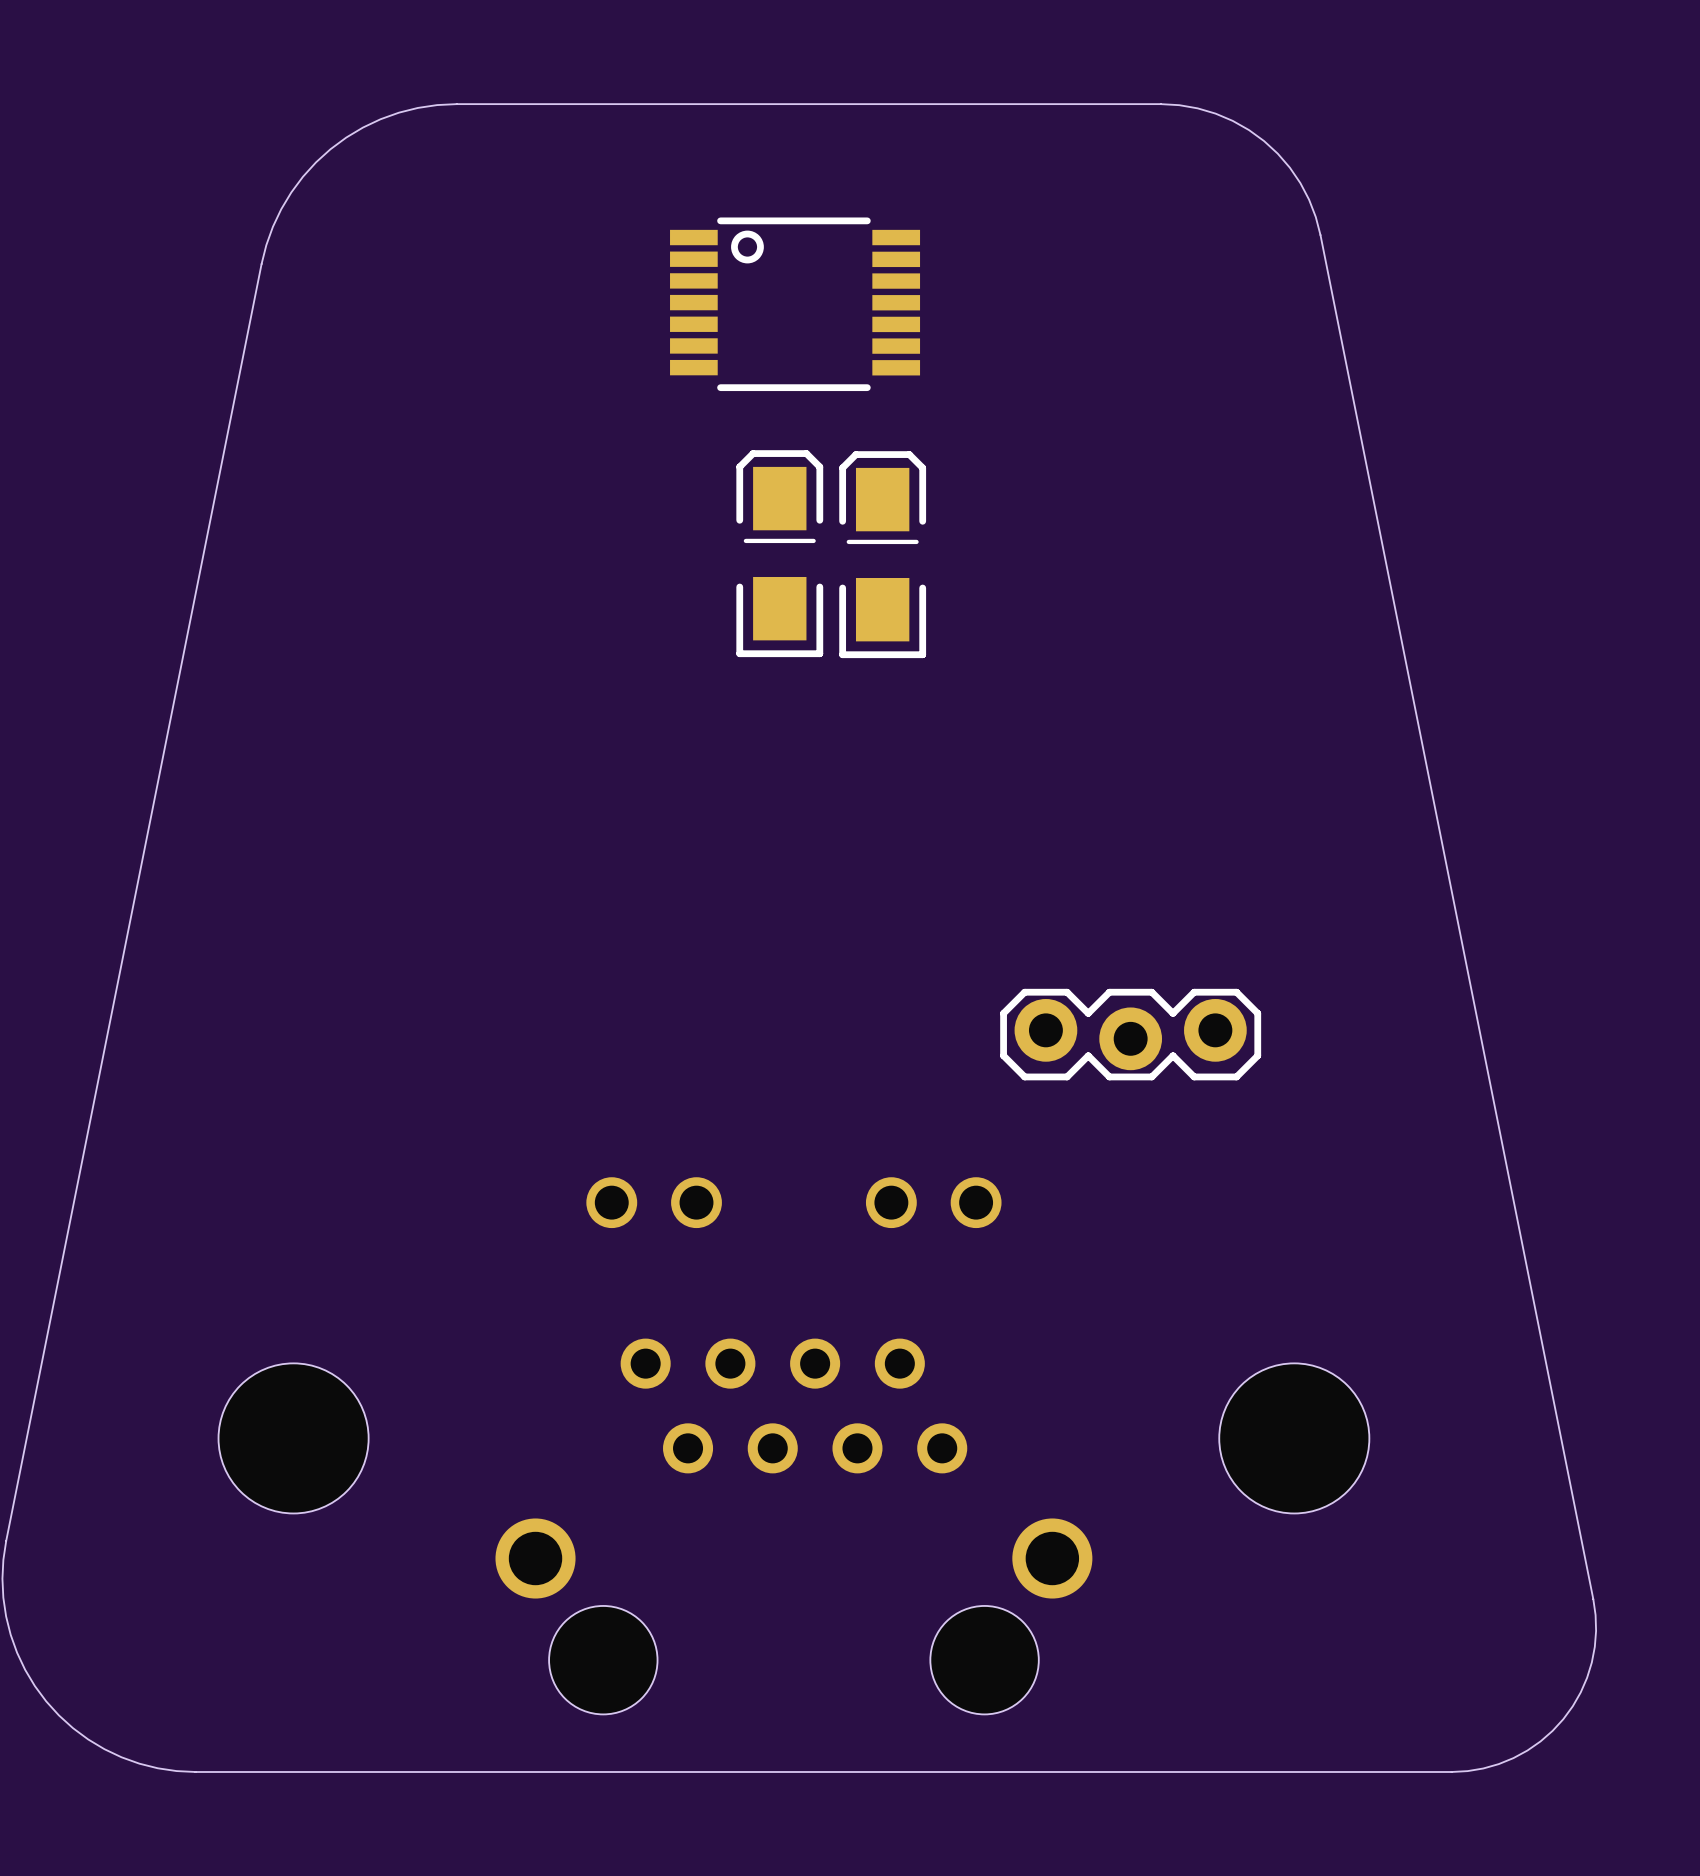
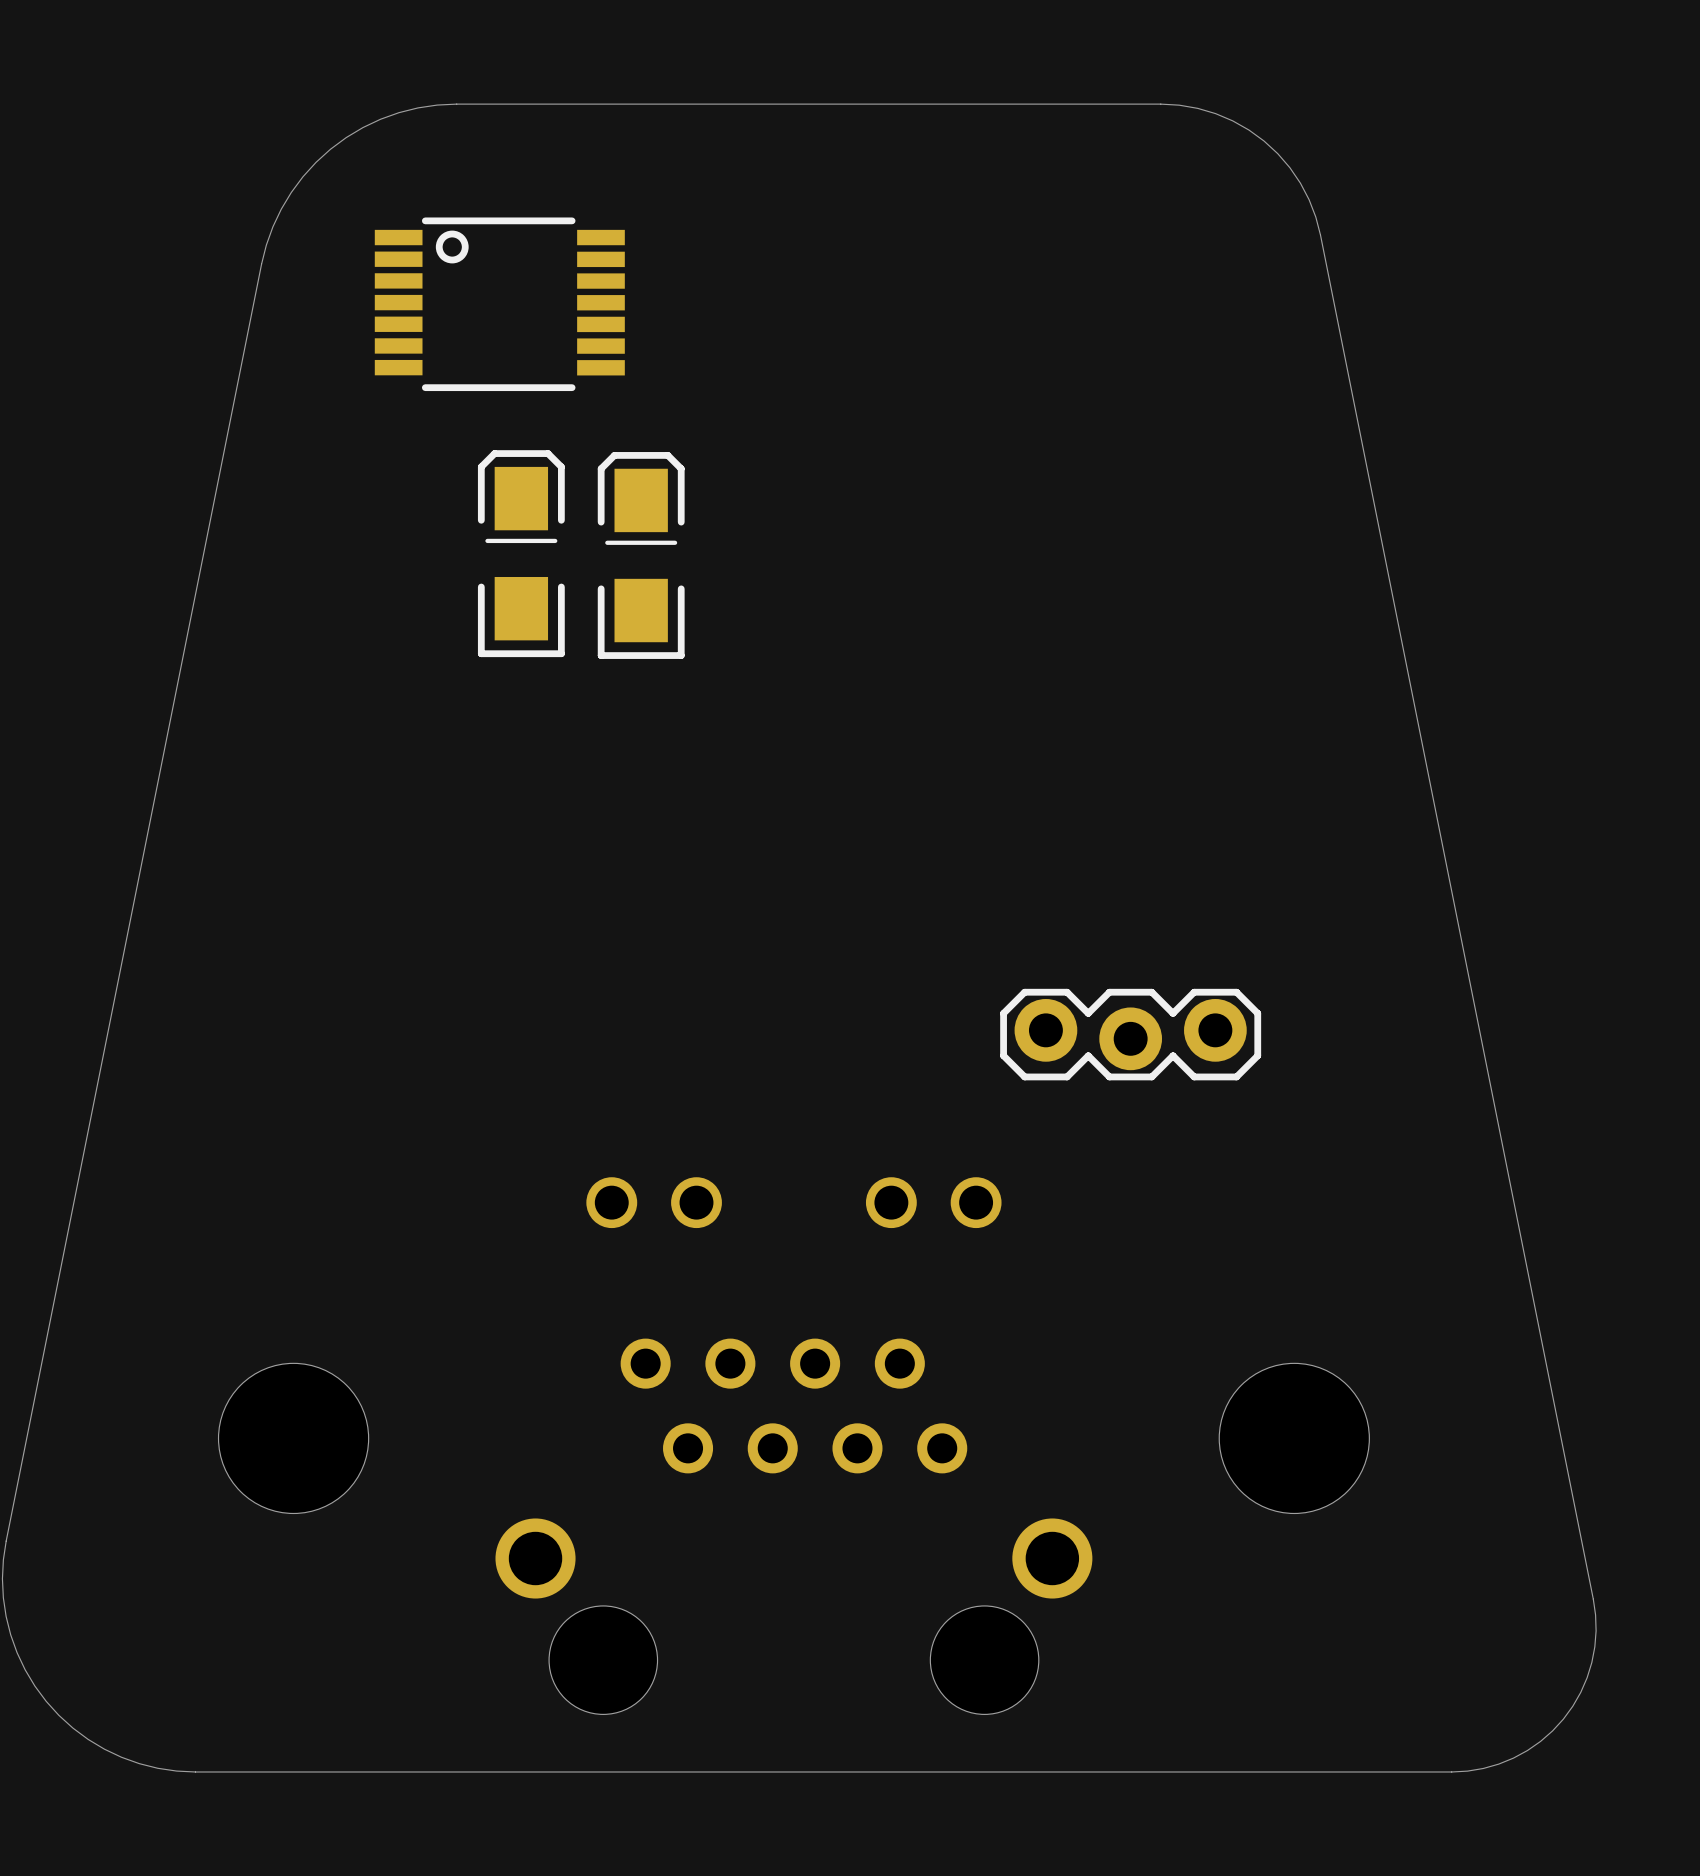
part position: (795, 304) -> (499, 304)
part: none -> (521, 553)
part: (779, 553) -> none
part: (882, 554) -> none
part: none -> (641, 555)

